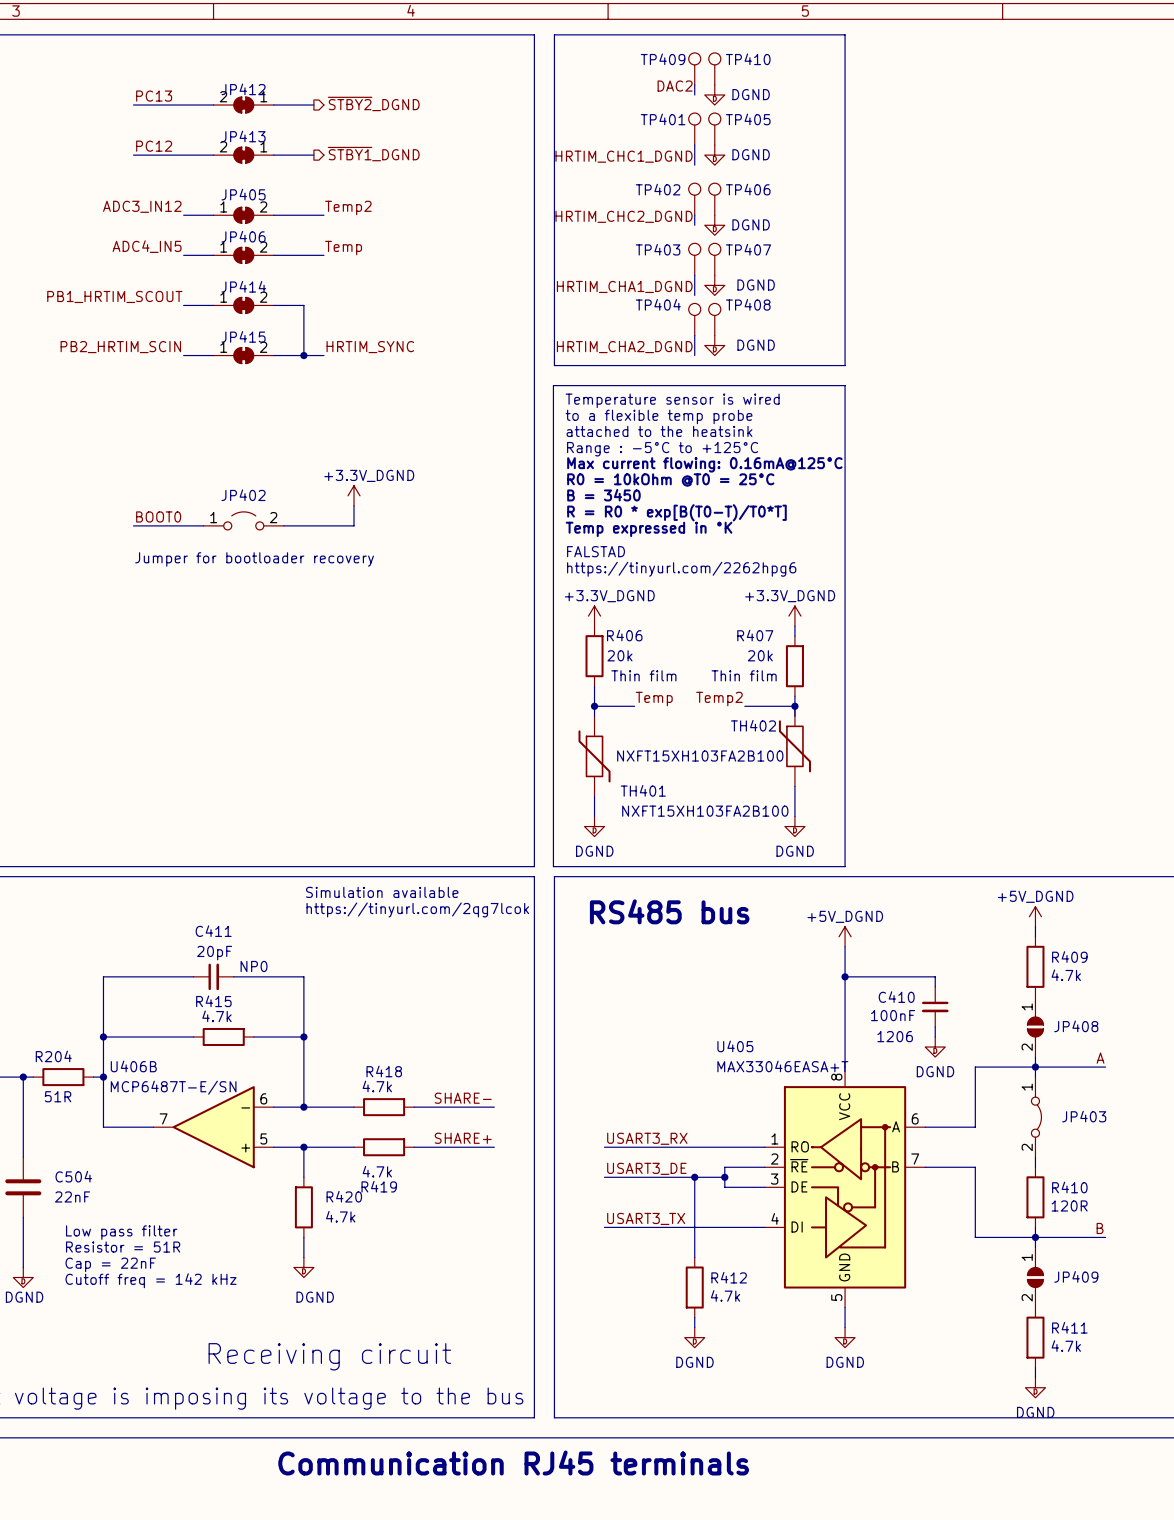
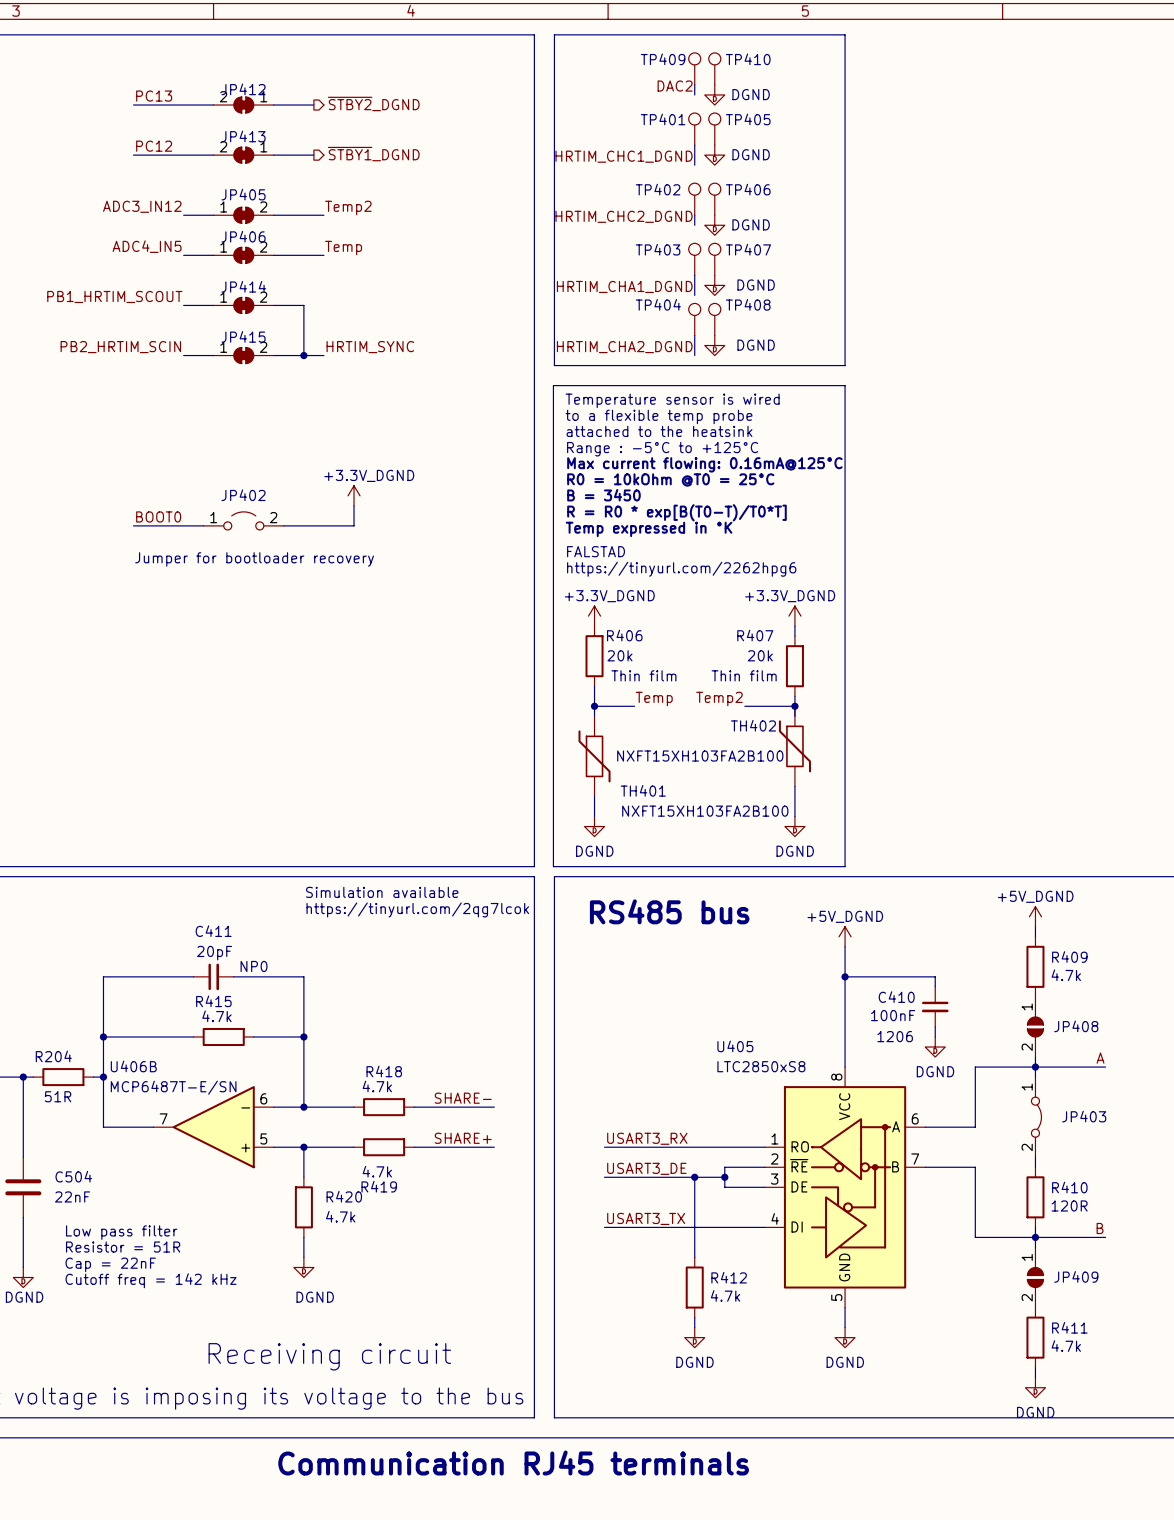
U405 value: MAX33046EASA+T (782, 1066) -> LTC2850xS8 (761, 1066)

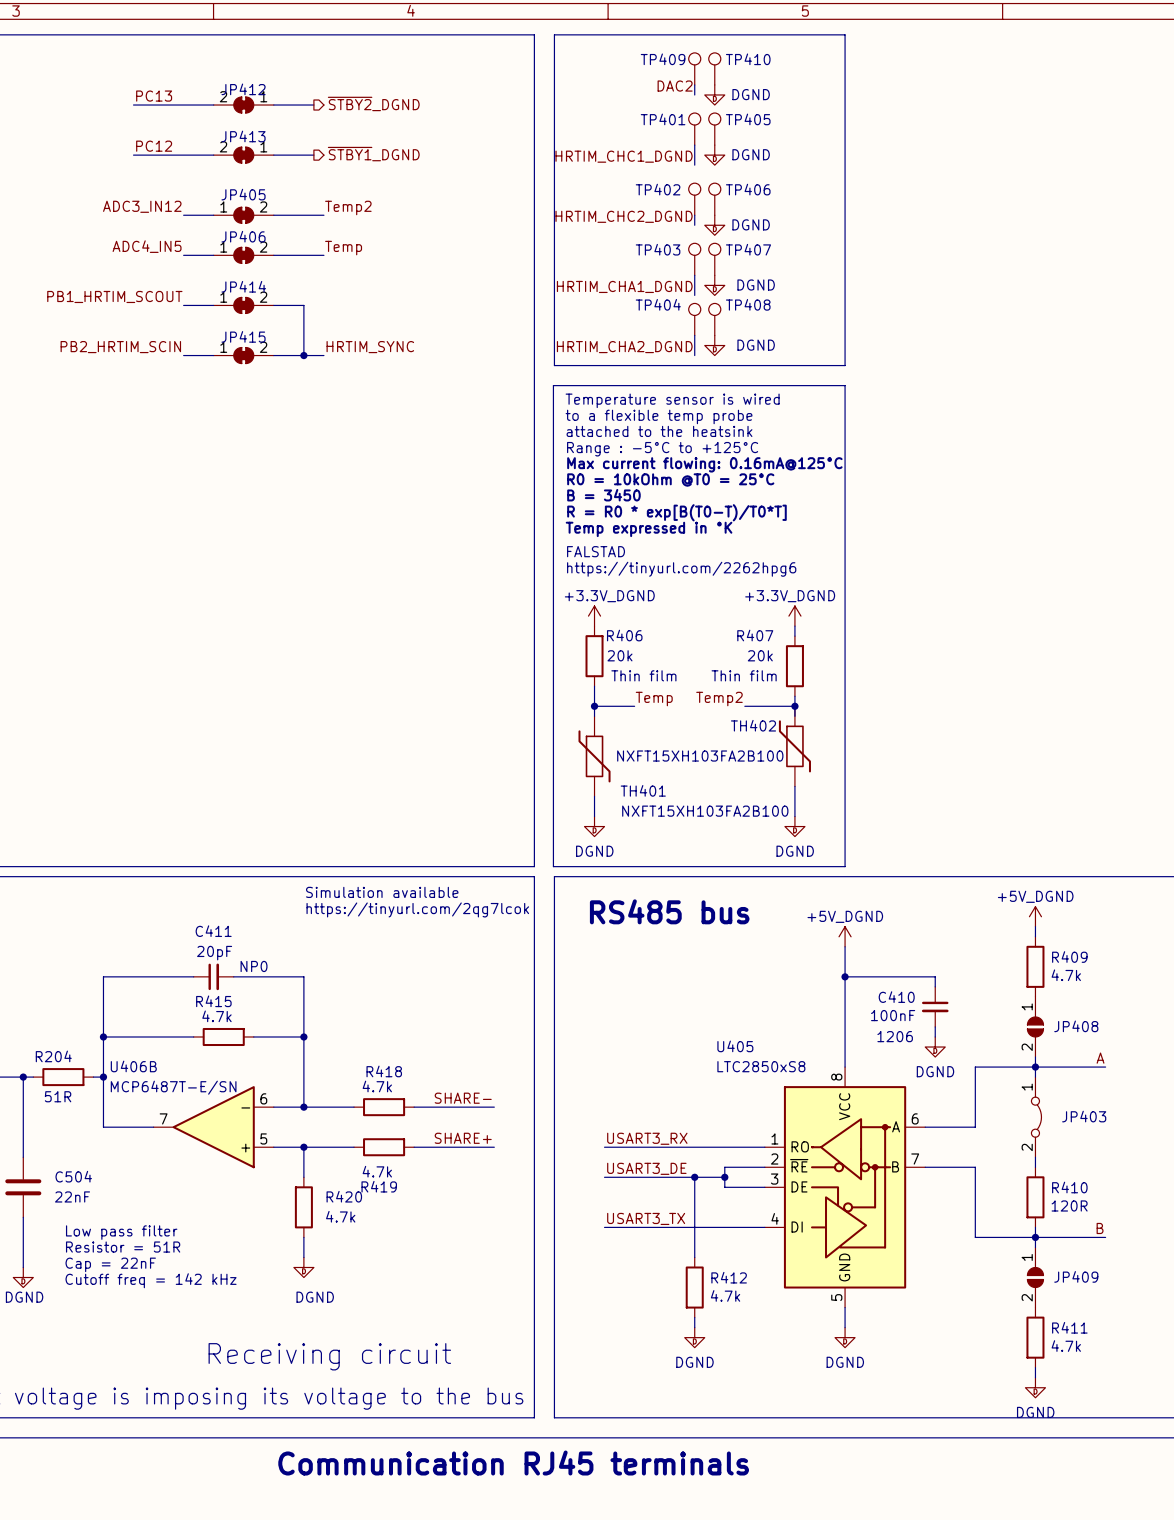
power symbol: +3.3V_DGND (354, 495) -> none
wire: (354, 505) (354, 525) (283, 525) -> none
label: BOOT0 (158, 516) -> none
JP402: (243, 520) -> none
wire: (133, 525) (203, 525) -> none
text: Jumper for bootloader recovery (254, 559) -> none

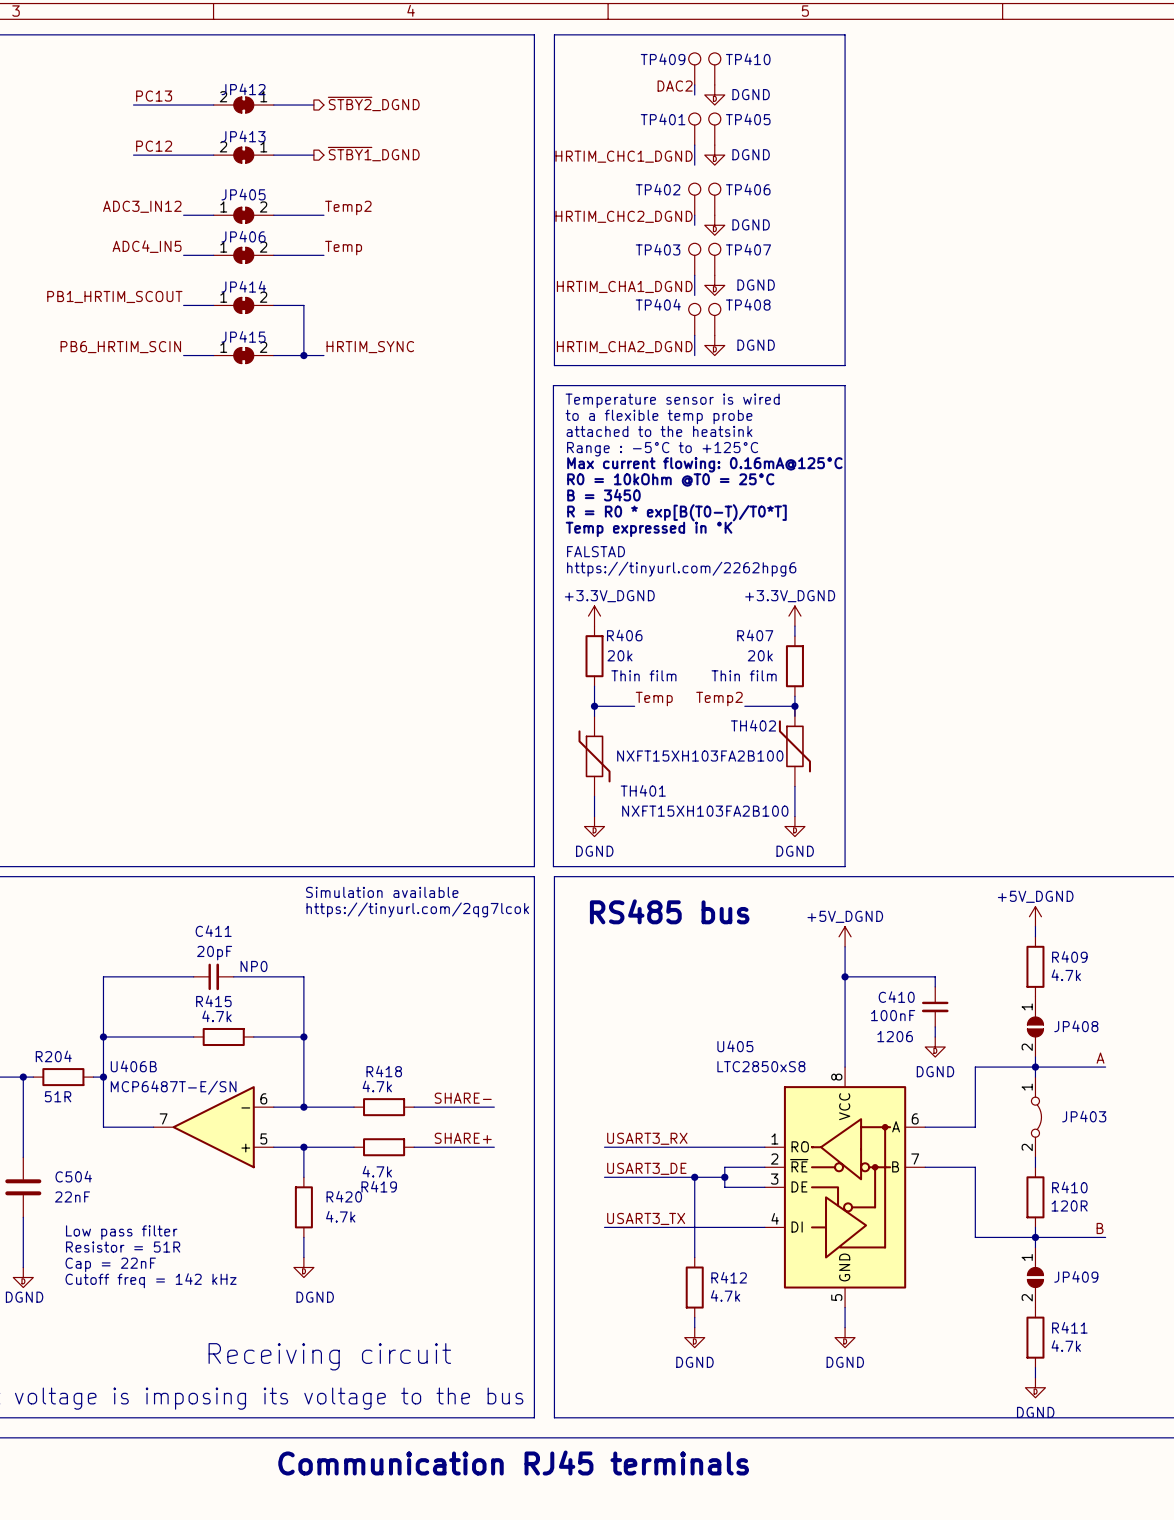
label: PB2_HRTIM_SCIN (120, 347) -> PB6_HRTIM_SCIN (120, 347)

